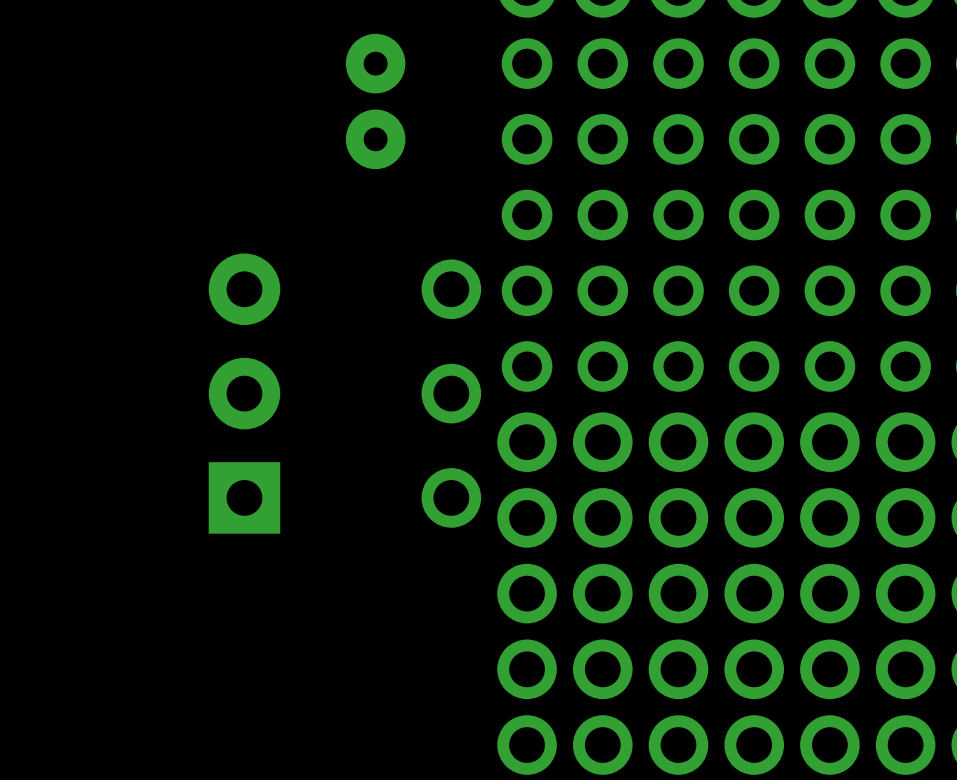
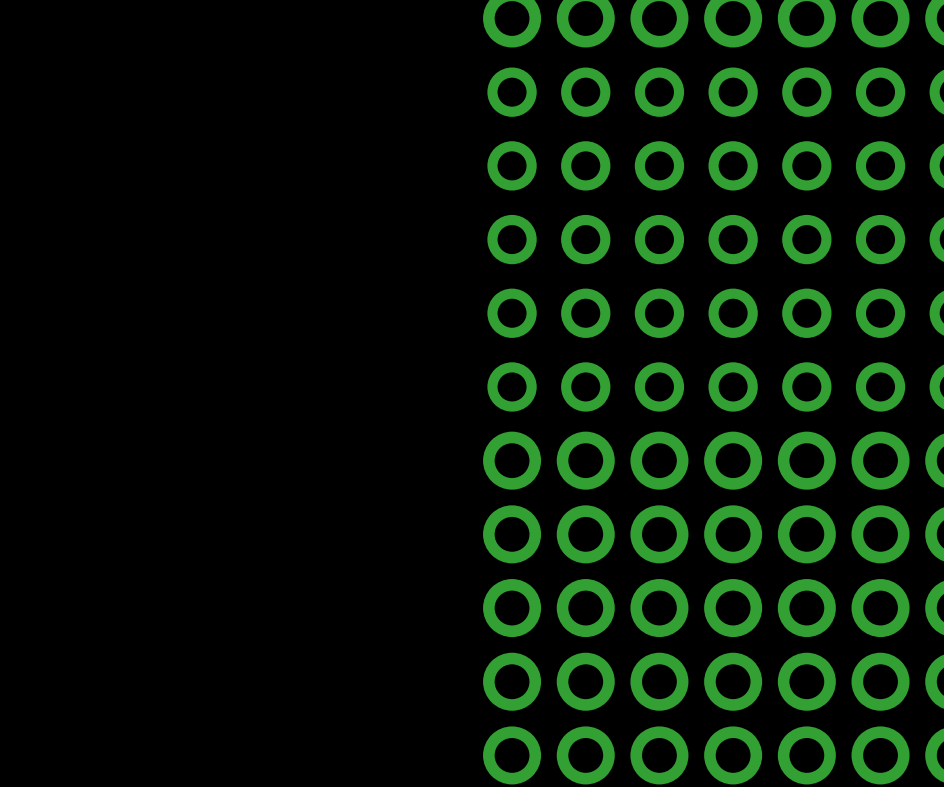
part: (375, 63) -> none
part: (375, 139) -> none
part: (451, 289) -> none
part: (244, 393) -> none
part: (451, 393) -> none
part: (451, 497) -> none

